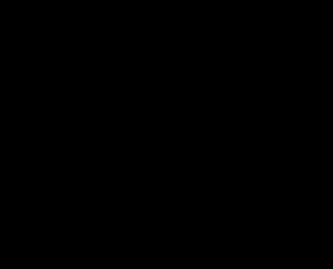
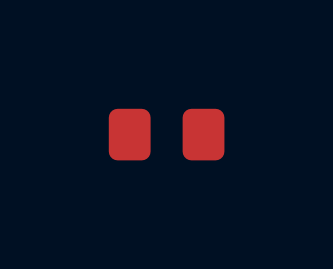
part: none -> (166, 134)

